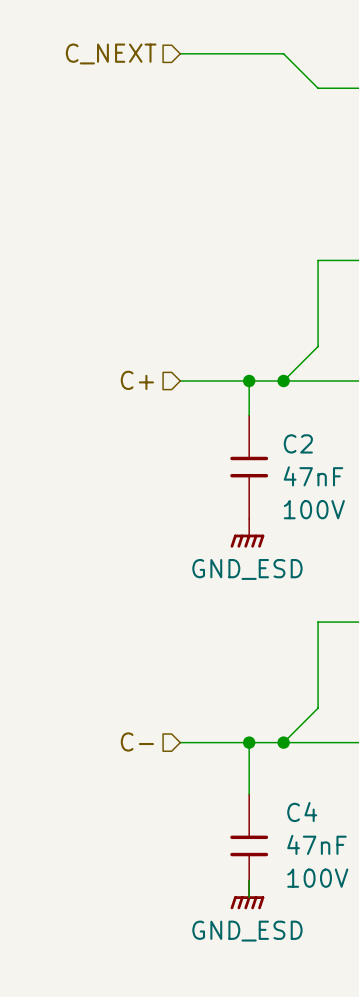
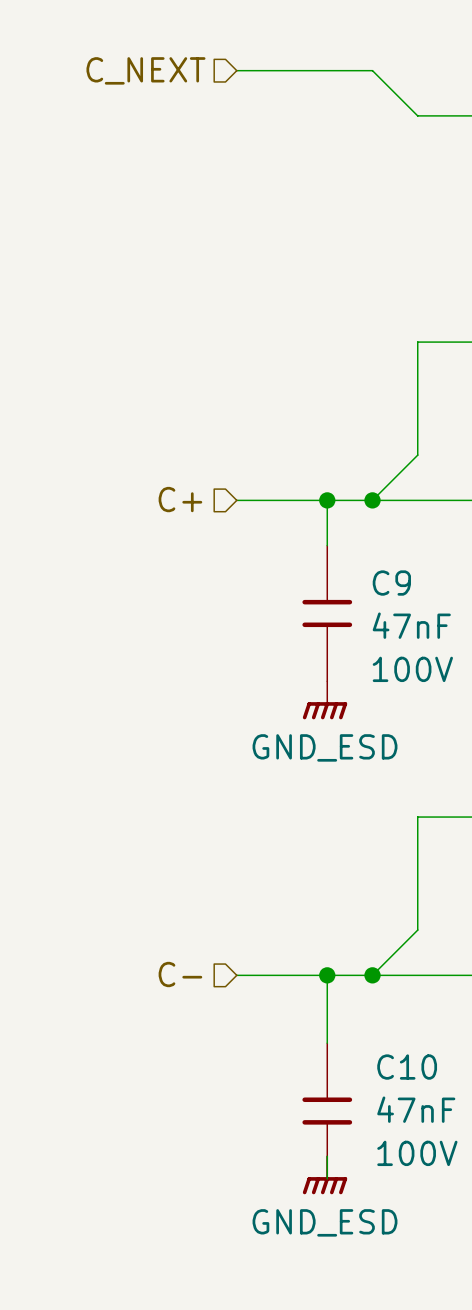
C2 name: C2 (298, 443) -> C9 (391, 583)
C4 name: C4 (302, 812) -> C10 (407, 1067)

